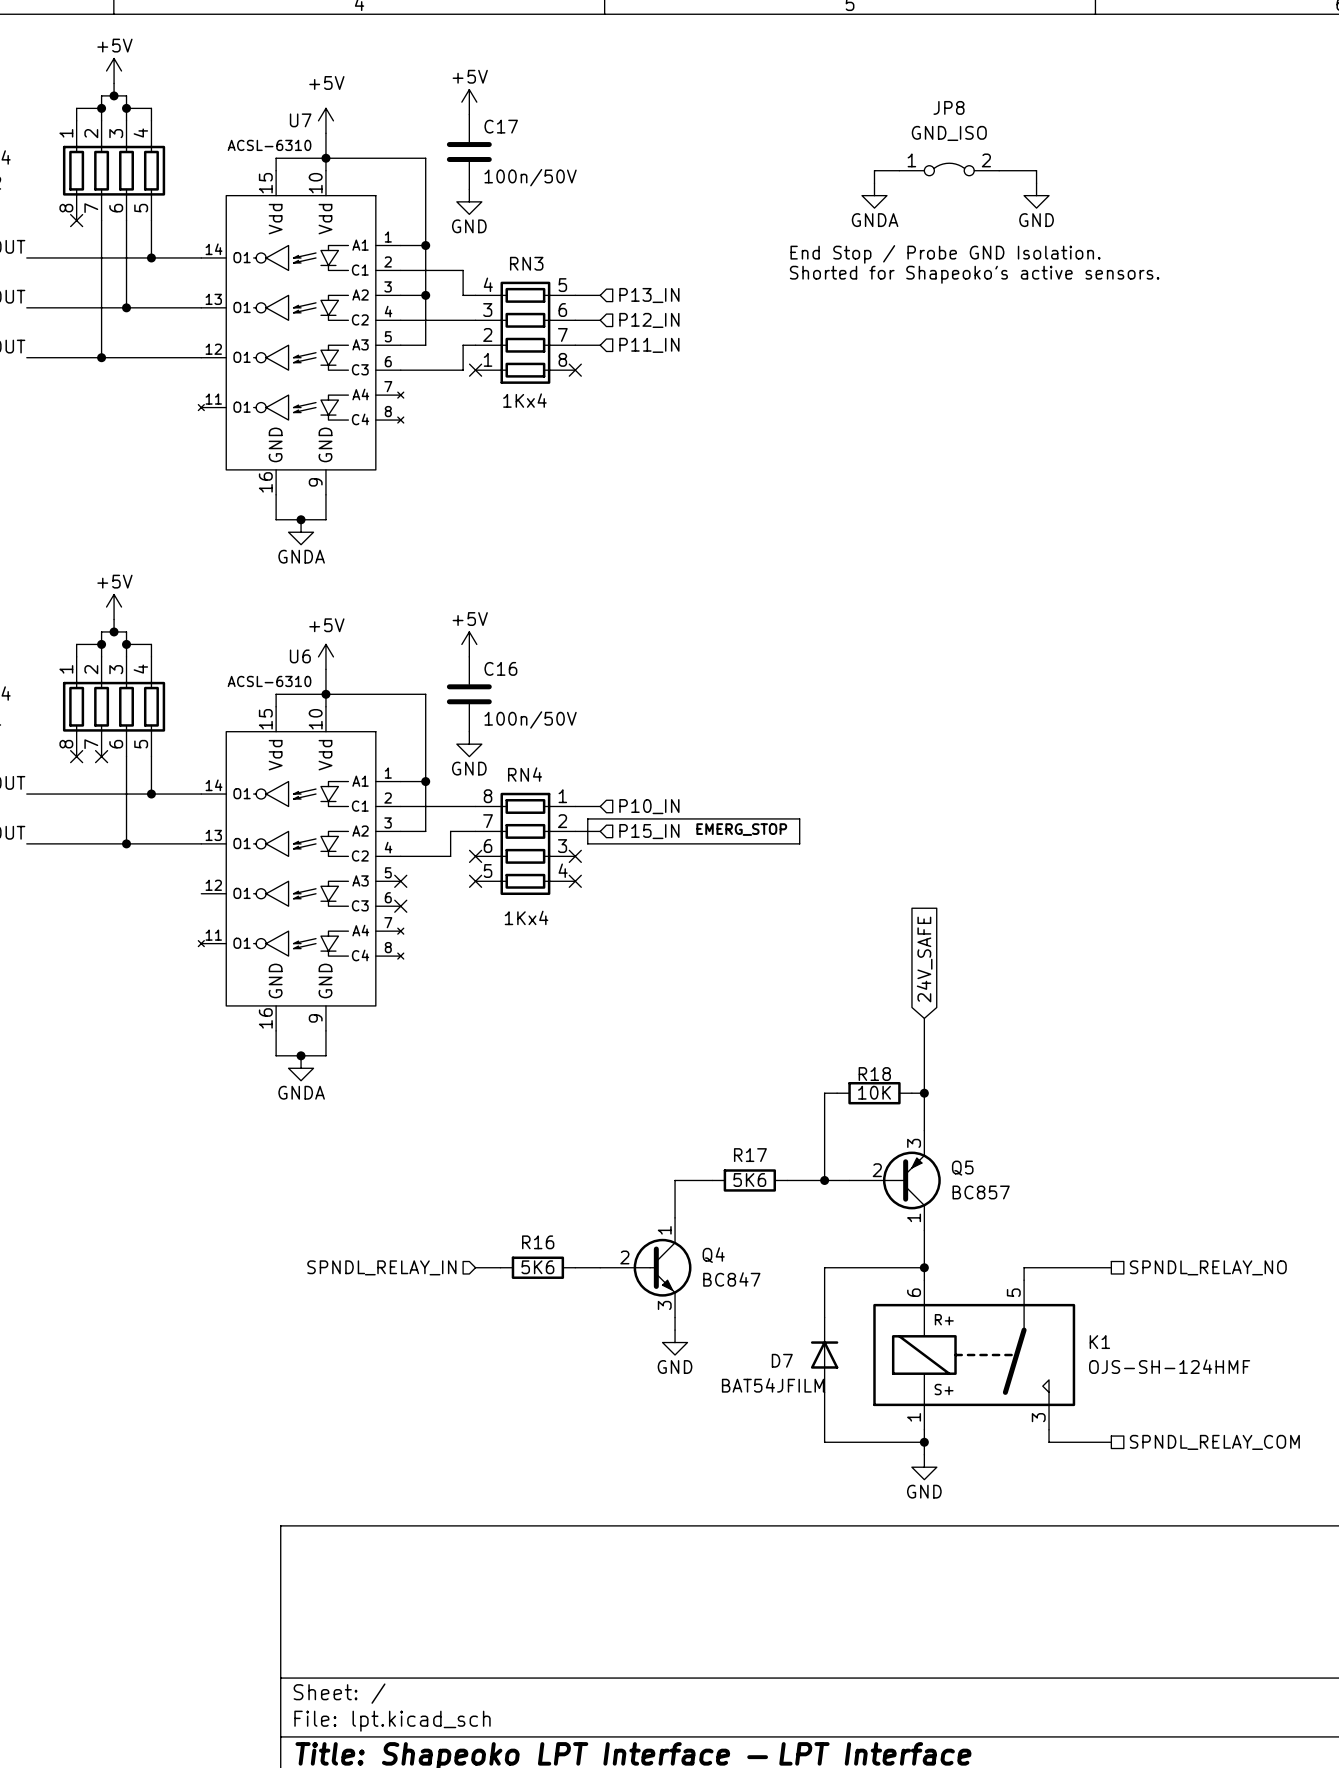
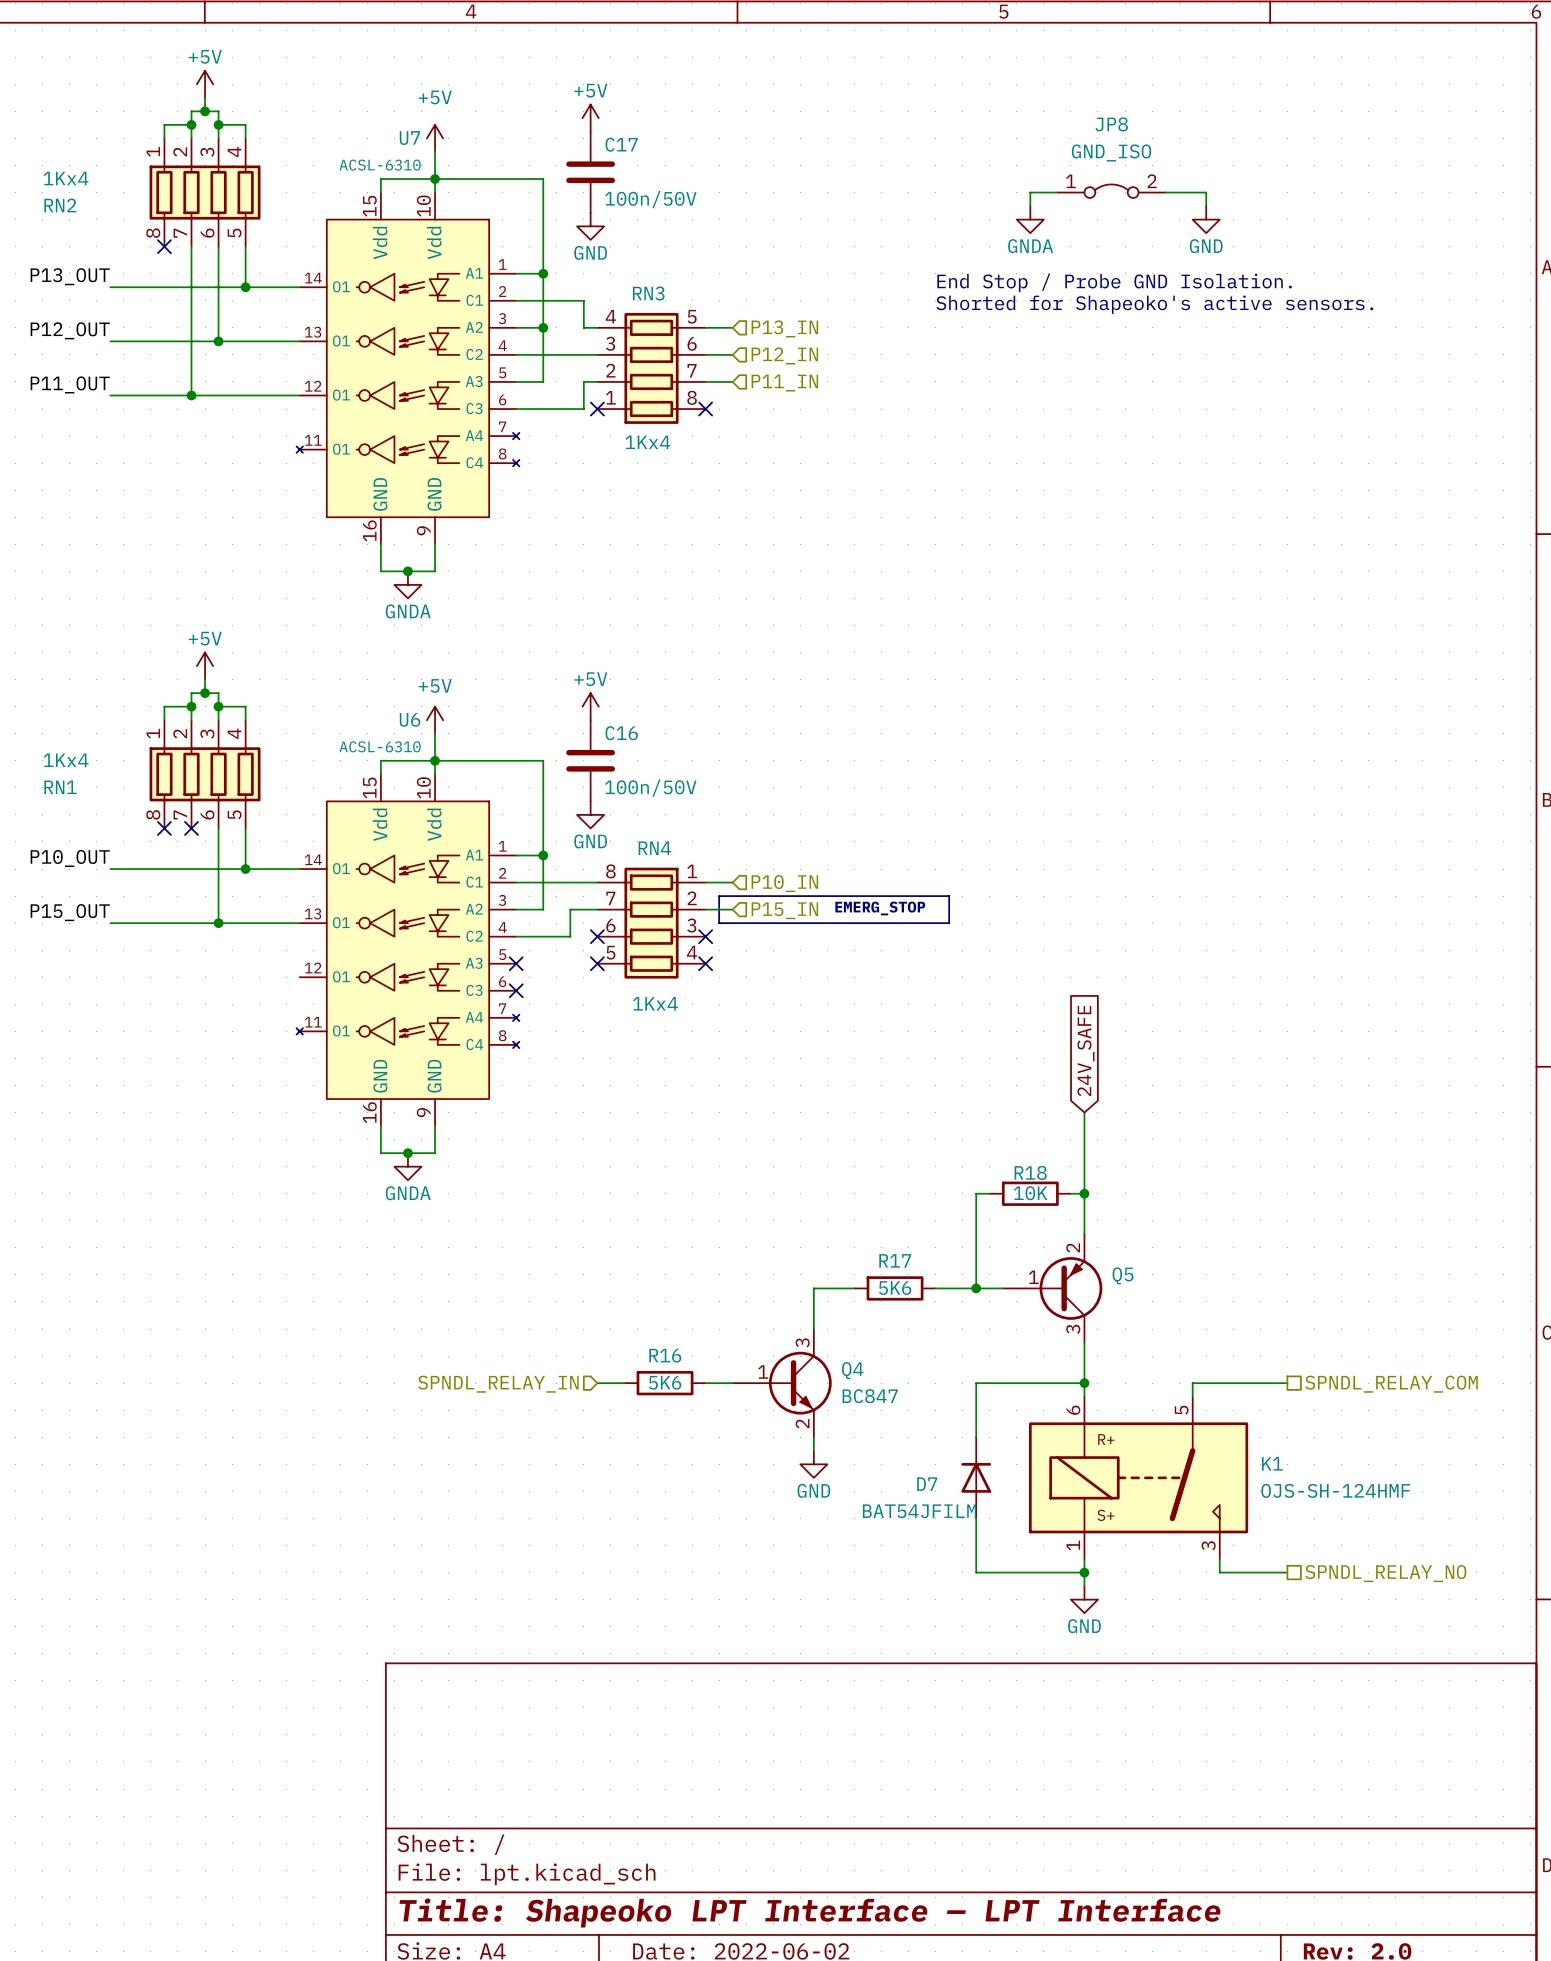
Q5 pin number: 3 (914, 1143) -> 2 (1073, 1247)
Q5 pin number: 2 (877, 1170) -> 1 (1033, 1277)
Q5 value: BC857 (981, 1192) -> none
Q4 symbol: [600, 1217, 692, 1318] -> [732, 1329, 832, 1438]
Q5 pin number: 1 (914, 1217) -> 3 (1073, 1329)
hierarchical label: SPNDL_RELAY_NO (1208, 1267) -> SPNDL_RELAY_COM (1391, 1384)
hierarchical label: SPNDL_RELAY_COM (1214, 1442) -> SPNDL_RELAY_NO (1385, 1573)

